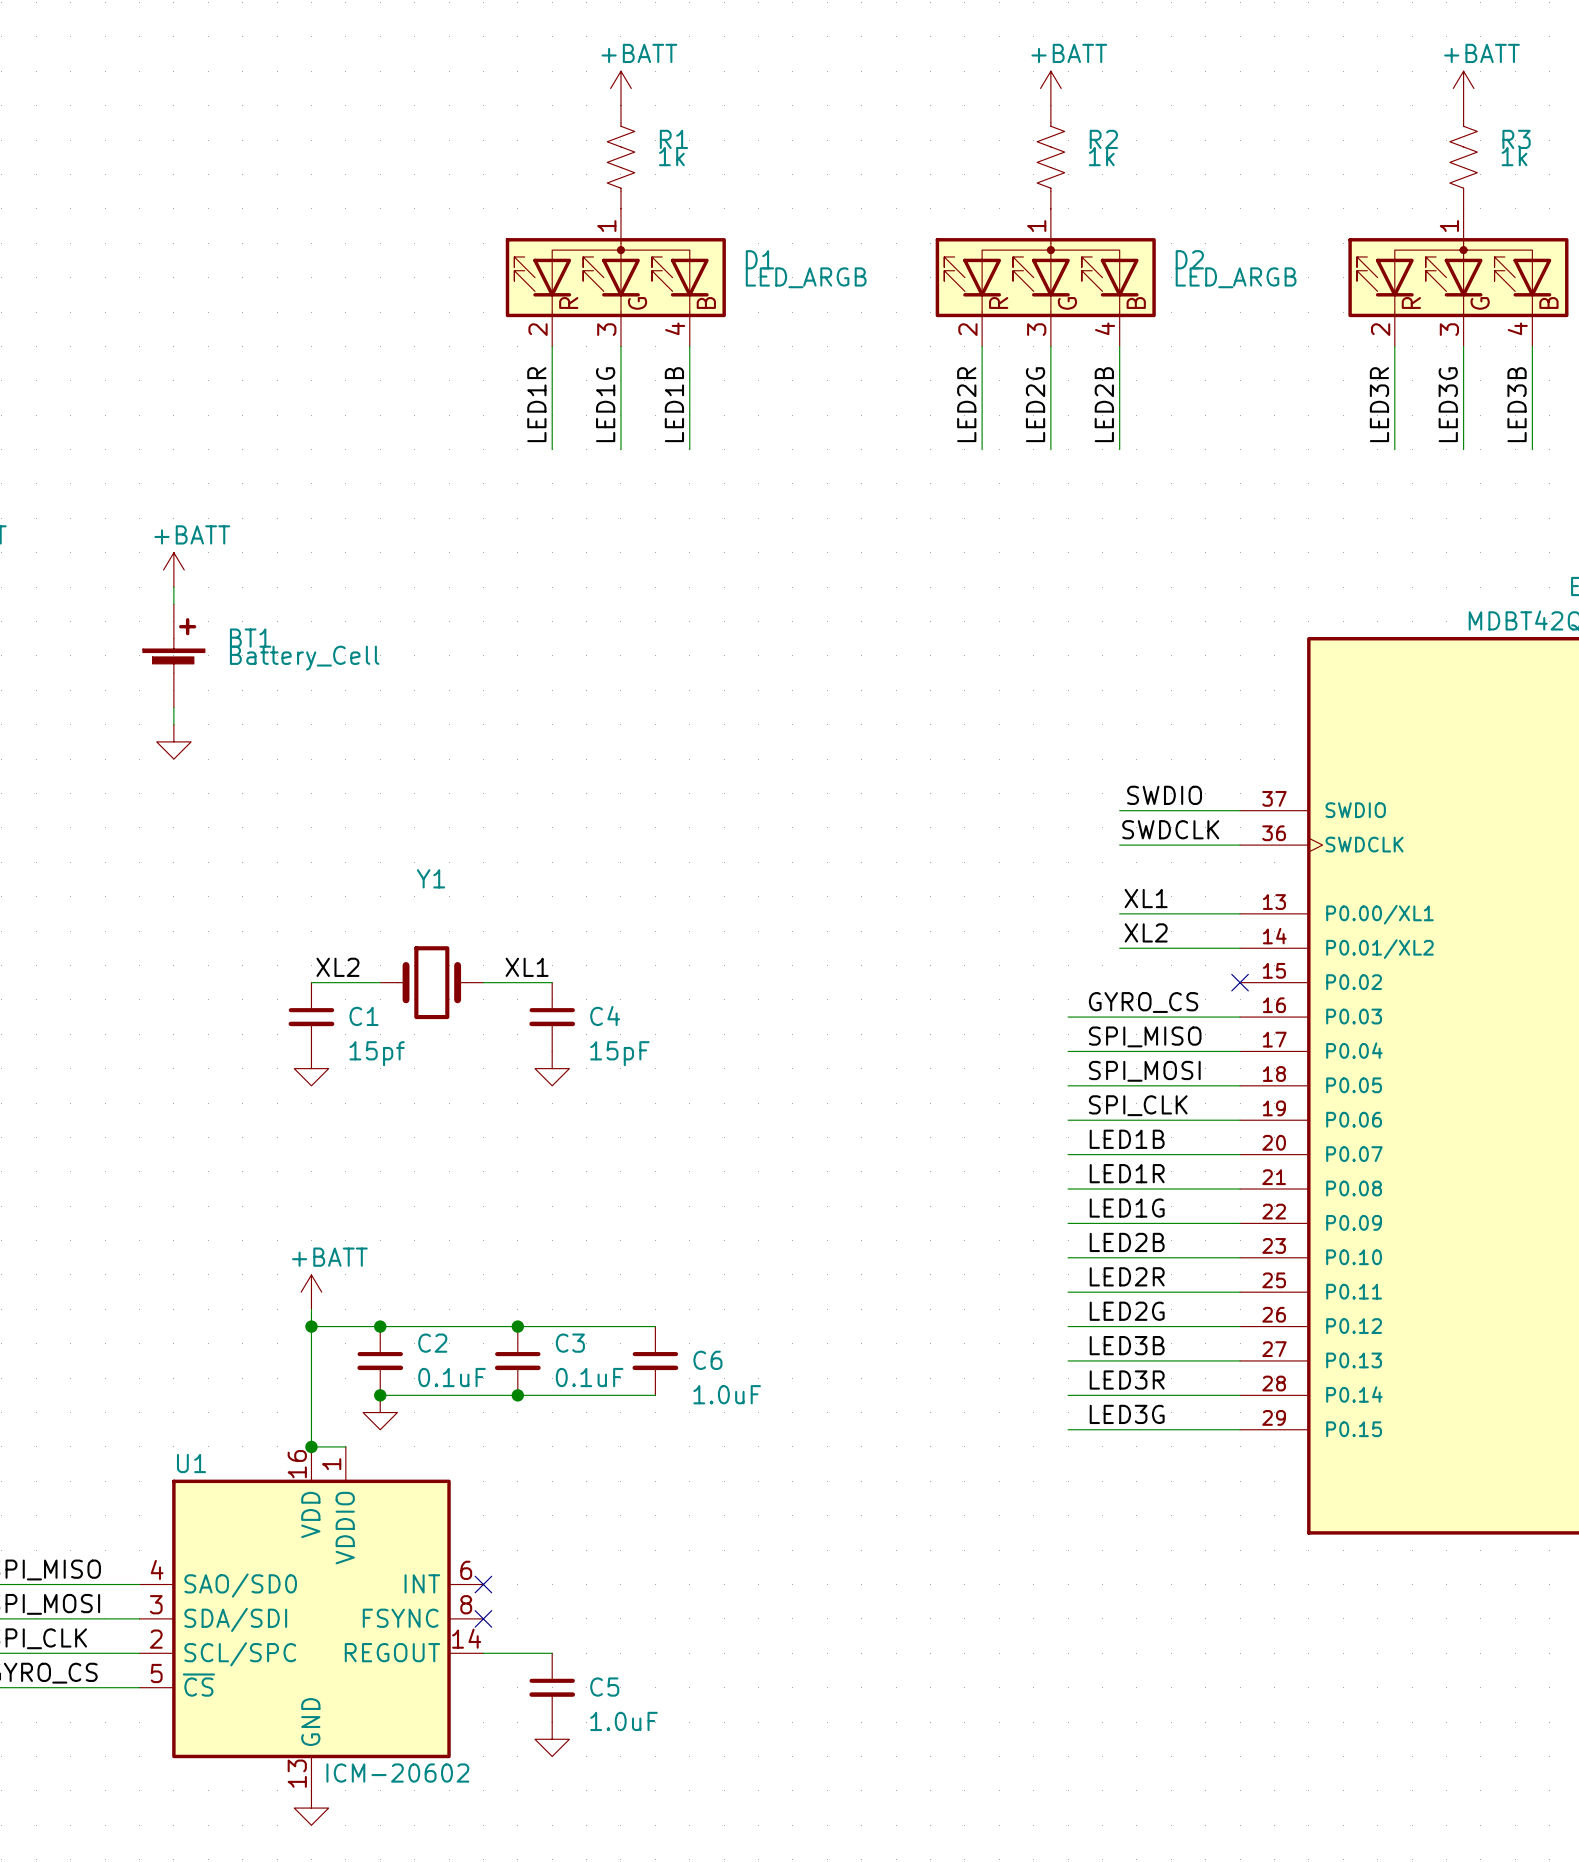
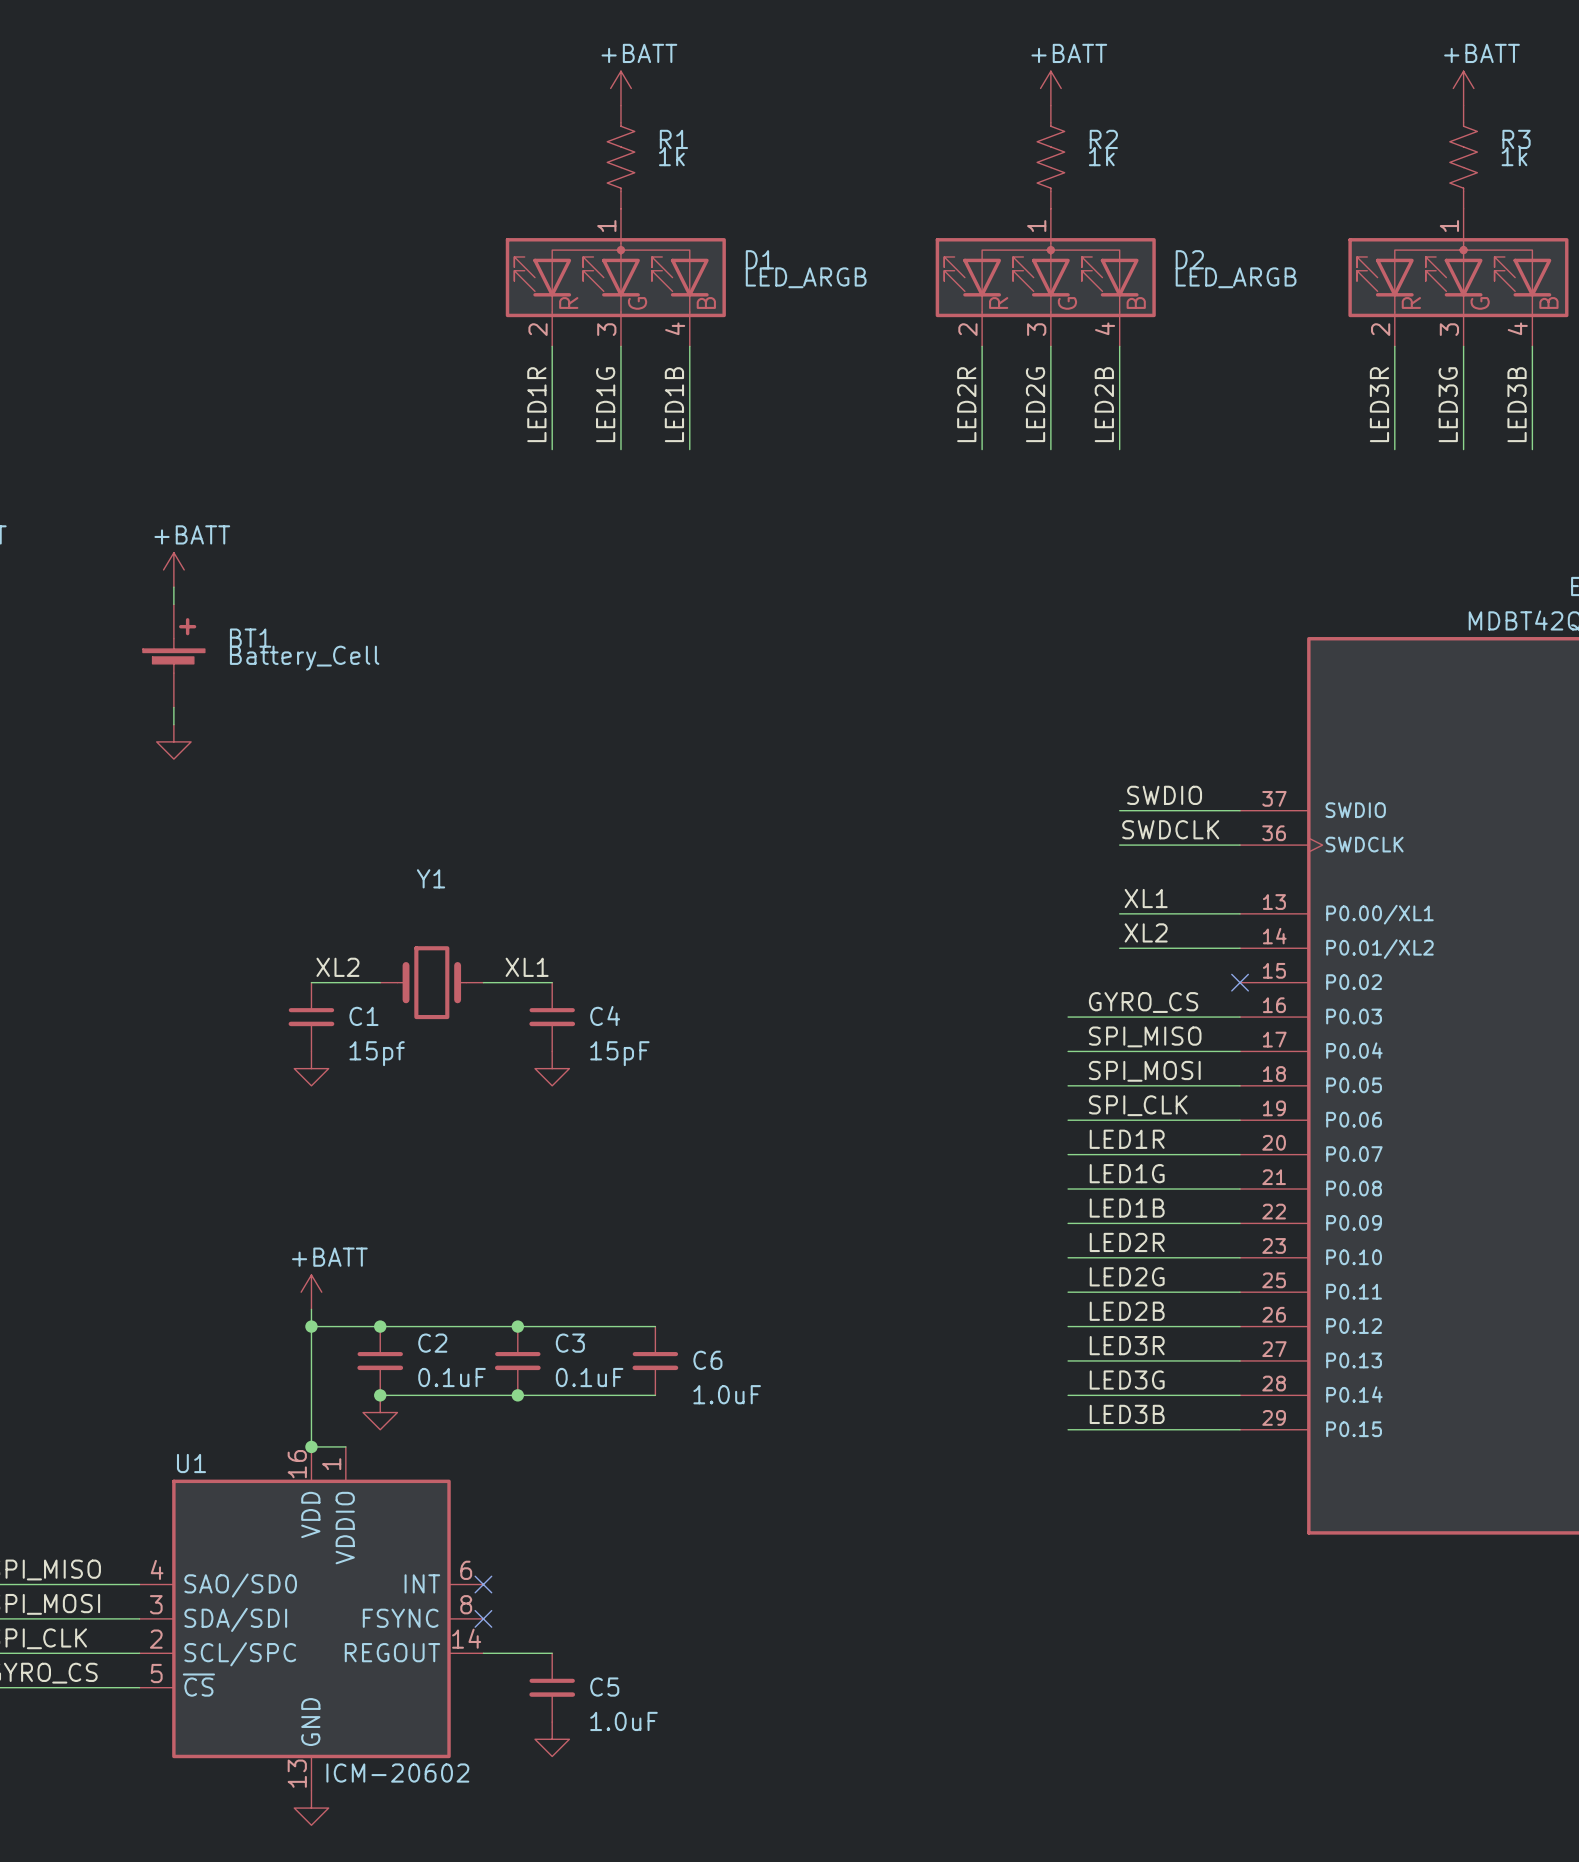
label: LED1B (1127, 1139) -> LED1R (1127, 1139)
label: LED1R (1127, 1173) -> LED1G (1127, 1173)
label: LED1G (1127, 1208) -> LED1B (1127, 1208)
label: LED2B (1127, 1242) -> LED2R (1127, 1242)
label: LED2R (1127, 1276) -> LED2G (1127, 1276)
label: LED2G (1127, 1311) -> LED2B (1127, 1311)
label: LED3B (1127, 1345) -> LED3R (1127, 1345)
label: LED3R (1127, 1380) -> LED3G (1127, 1380)
label: LED3G (1127, 1414) -> LED3B (1127, 1414)

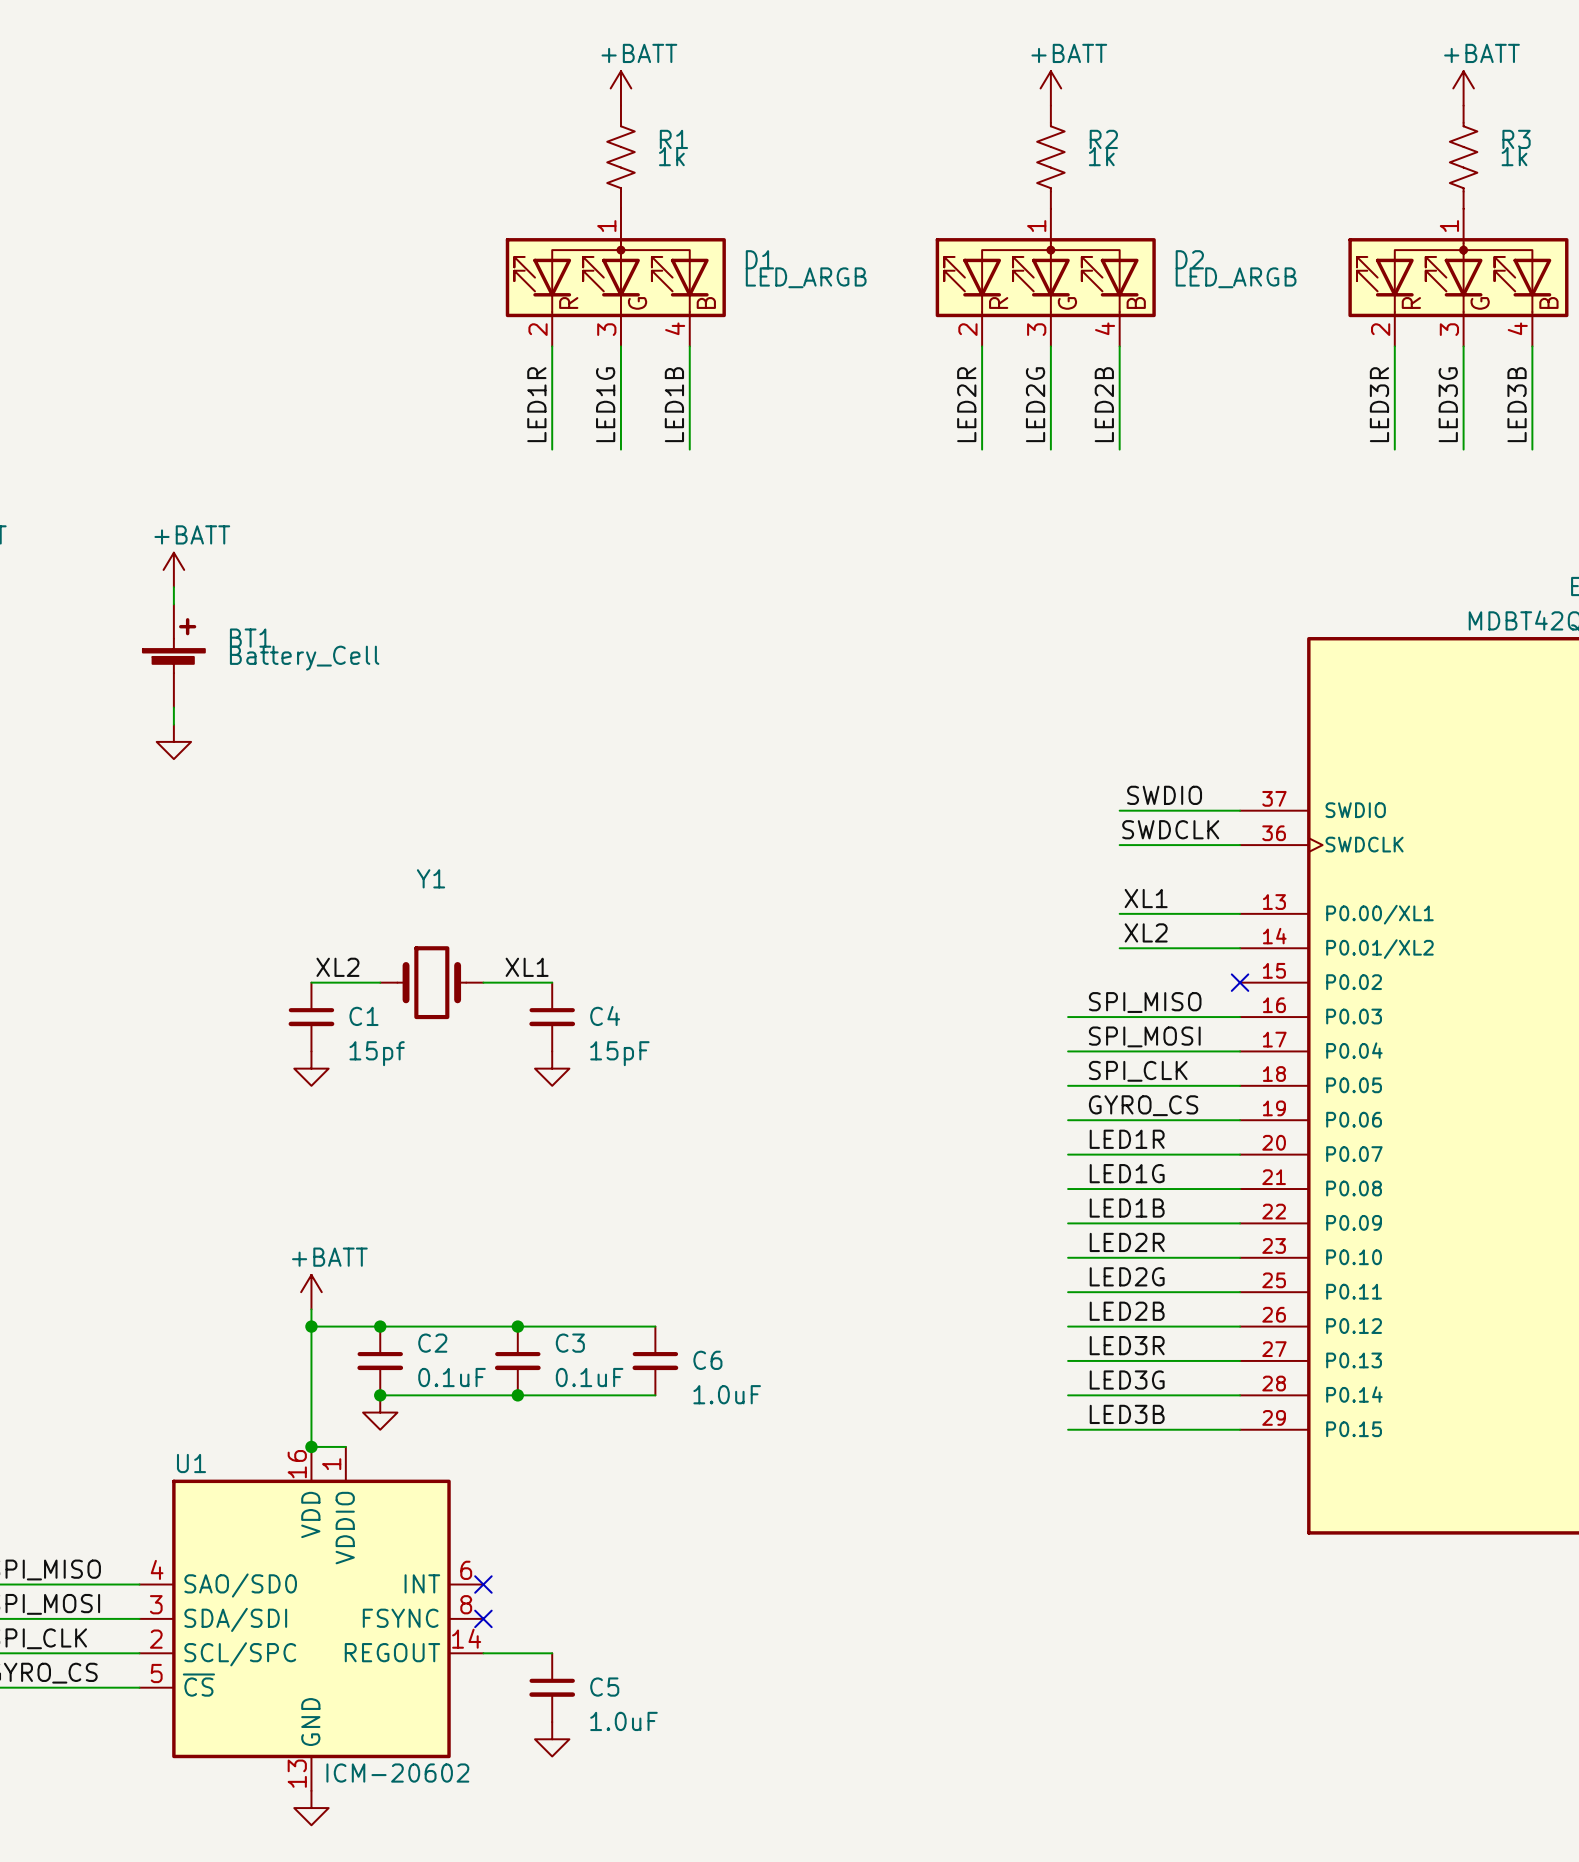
label: GYRO_CS (1143, 1002) -> SPI_MISO (1145, 1002)
label: SPI_MISO (1145, 1036) -> SPI_MOSI (1144, 1036)
label: SPI_MOSI (1144, 1071) -> SPI_CLK (1138, 1071)
label: SPI_CLK (1138, 1105) -> GYRO_CS (1143, 1105)

